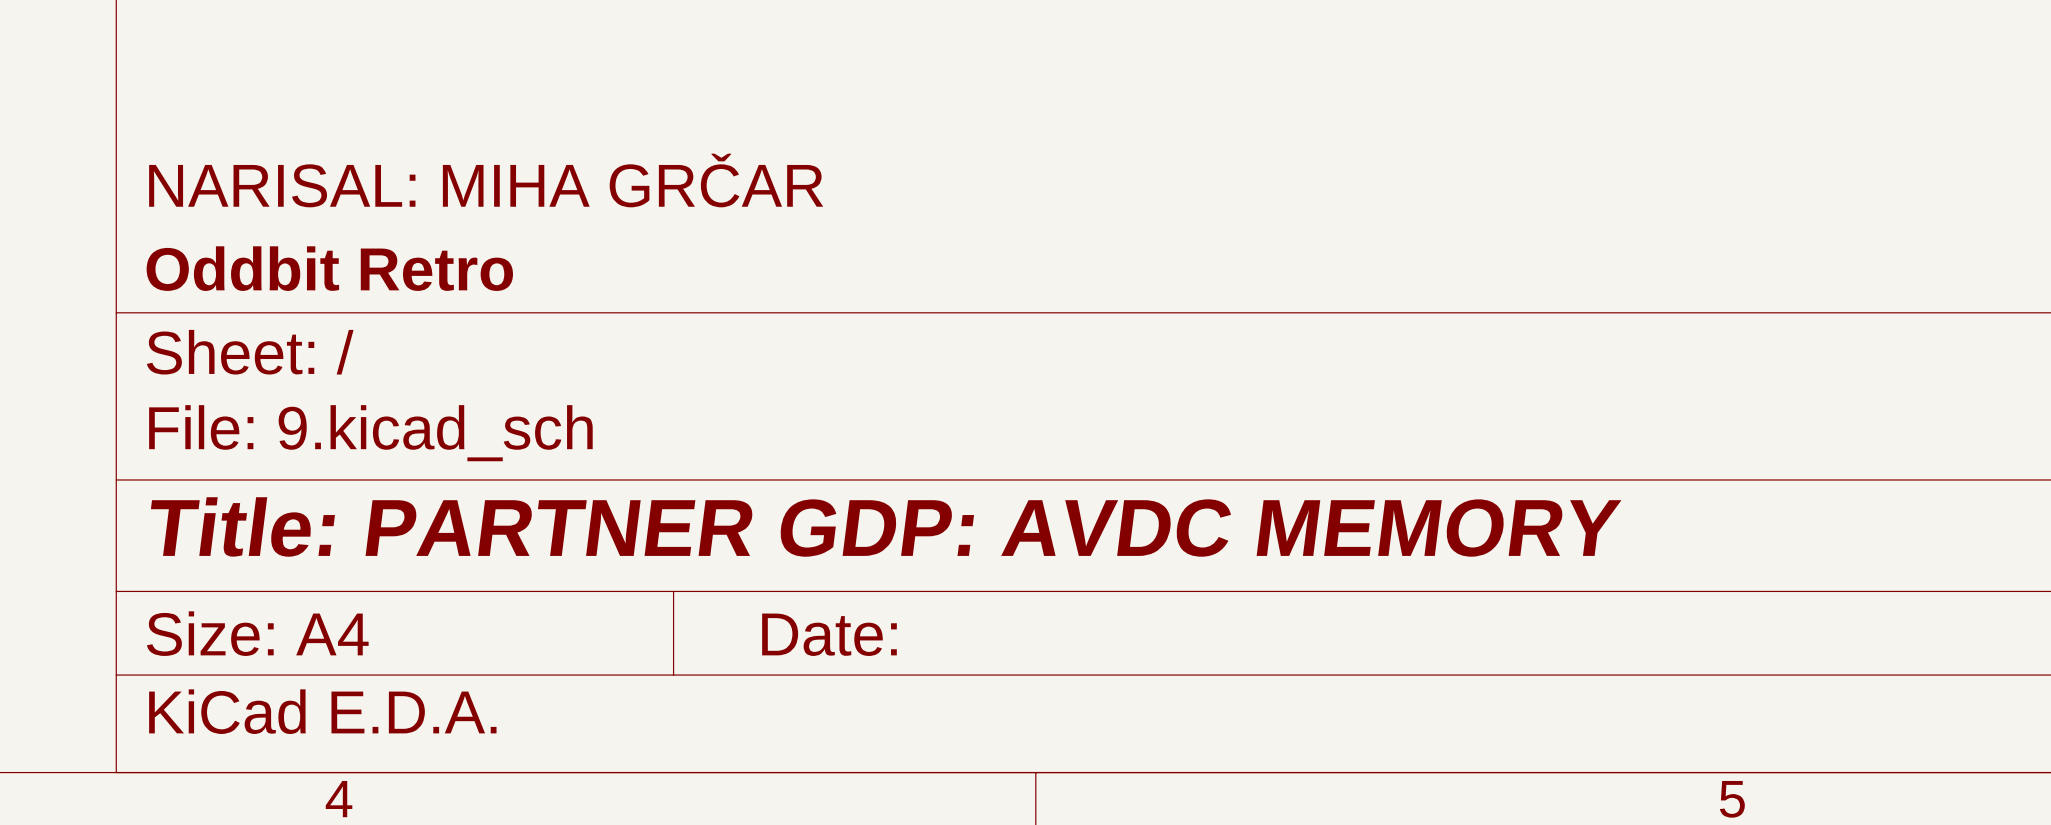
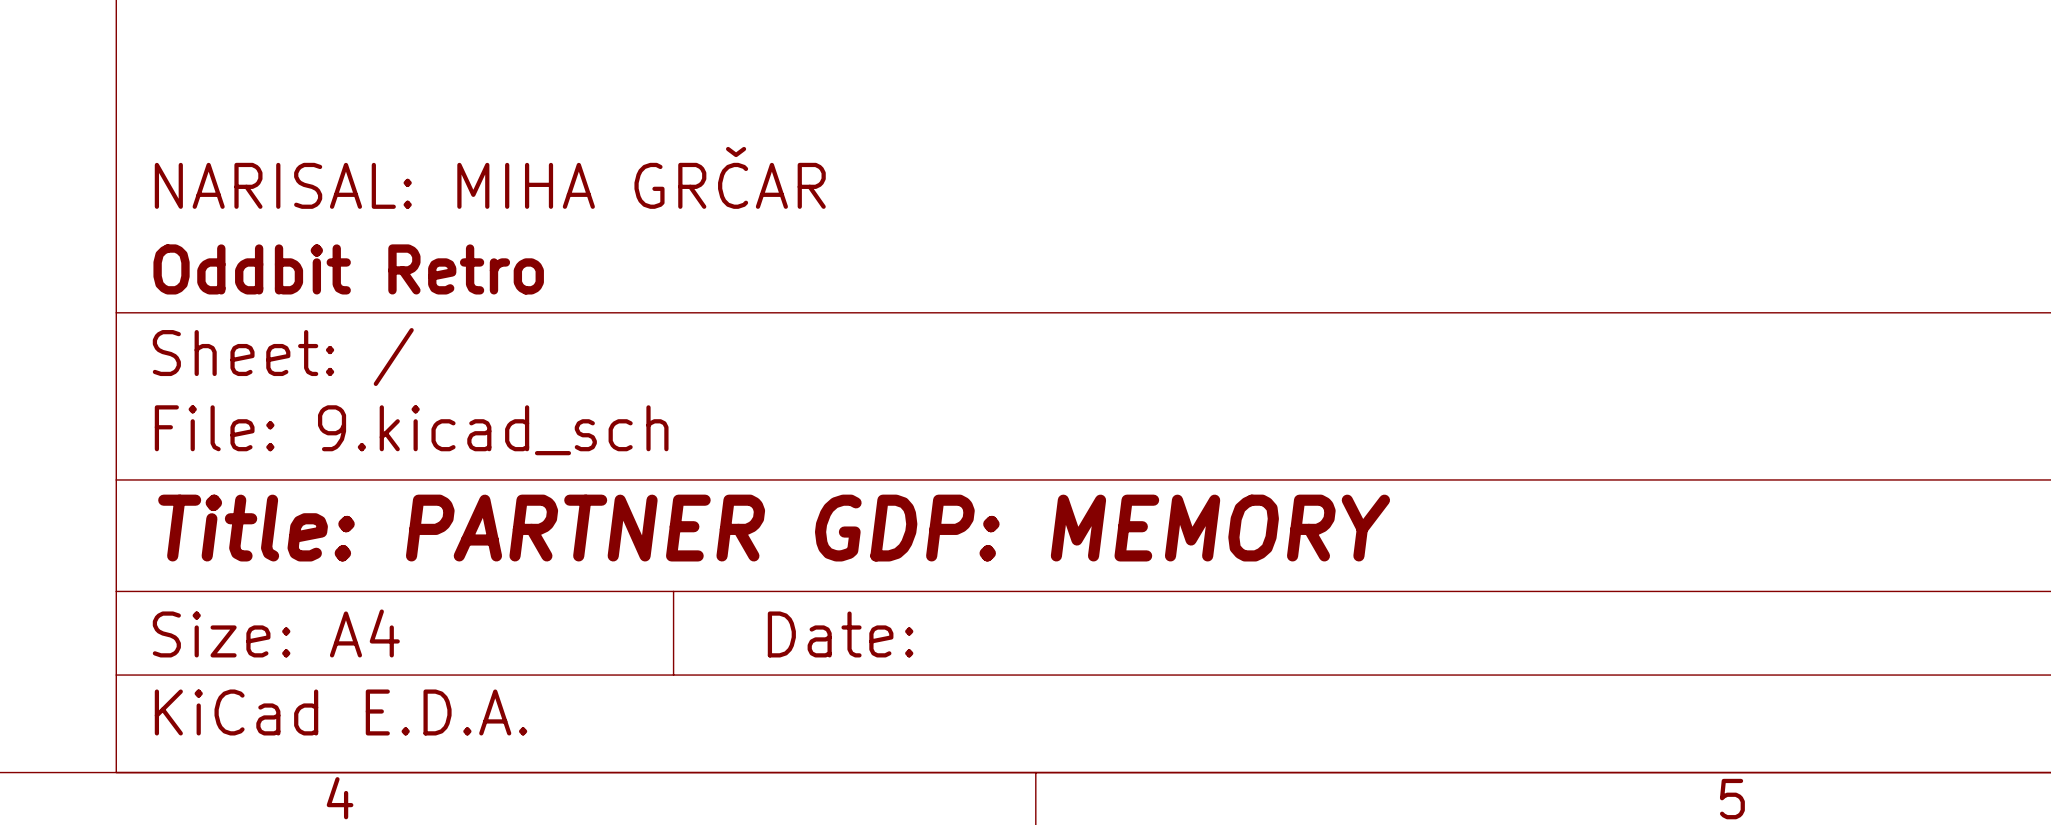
title block: Title: PARTNER GDP: AVDC MEMORY (886, 526) -> Title: PARTNER GDP: MEMORY (774, 528)

